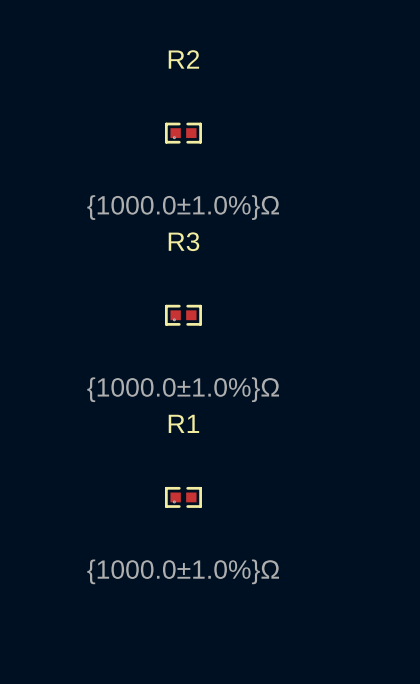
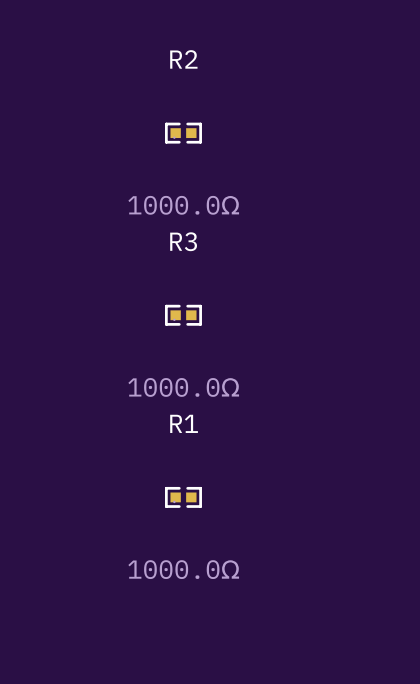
R2 value: {1000.0±1.0%}Ω (183, 207) -> 1000.0Ω (183, 205)
R3 value: {1000.0±1.0%}Ω (183, 389) -> 1000.0Ω (183, 387)
R1 value: {1000.0±1.0%}Ω (183, 571) -> 1000.0Ω (183, 569)

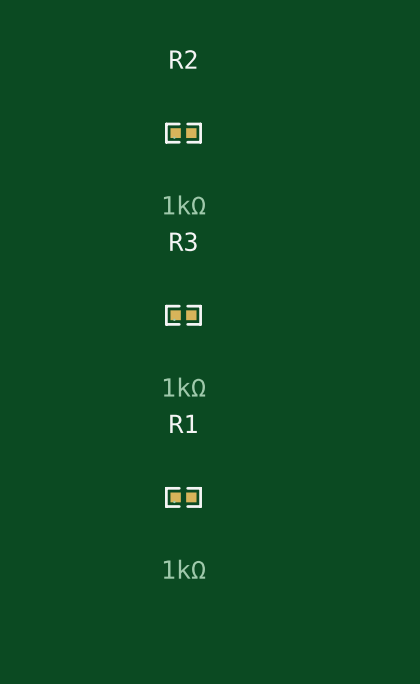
R2 value: 1000.0Ω (183, 205) -> 1kΩ (184, 204)
R3 value: 1000.0Ω (183, 387) -> 1kΩ (184, 387)
R1 value: 1000.0Ω (183, 569) -> 1kΩ (184, 569)

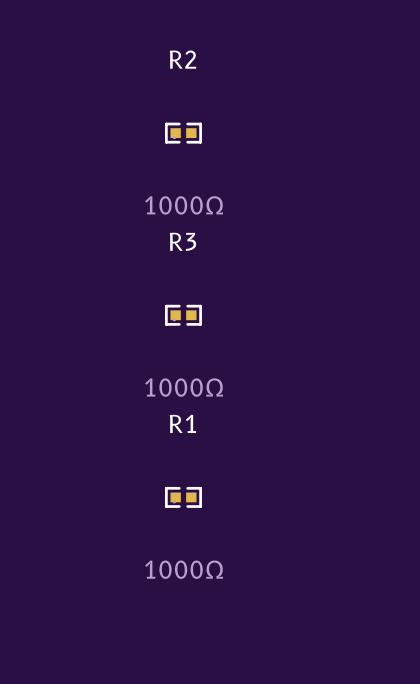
R2 value: 1kΩ (184, 204) -> 1000Ω (184, 205)
R3 value: 1kΩ (184, 387) -> 1000Ω (184, 387)
R1 value: 1kΩ (184, 569) -> 1000Ω (184, 569)

